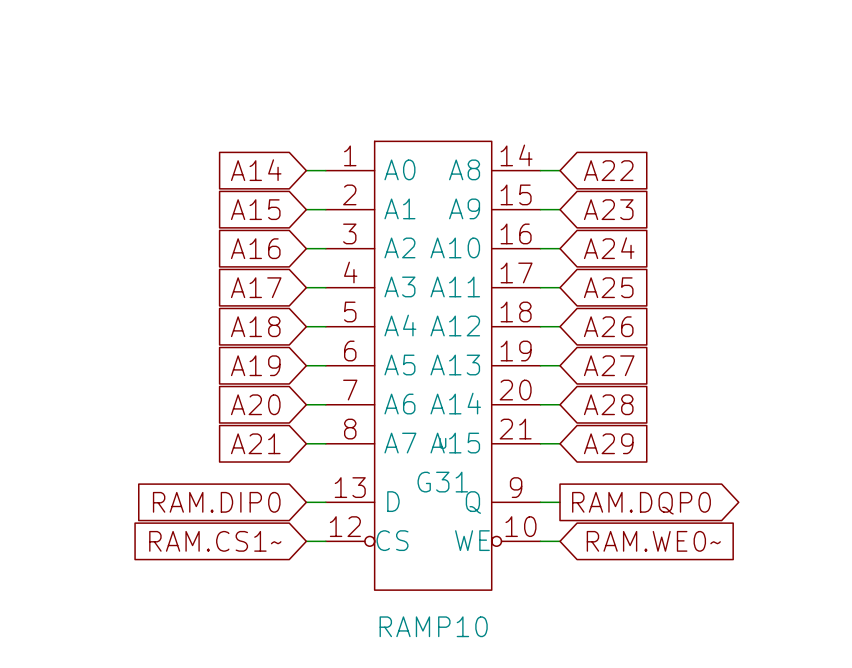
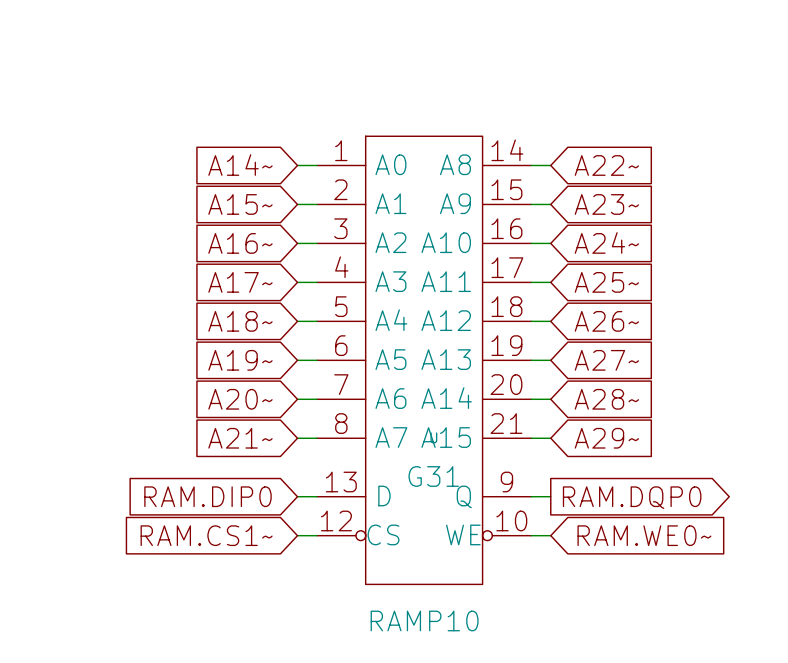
global label: A14 (256, 170) -> A14~ (240, 165)
global label: A22 (608, 170) -> A22~ (606, 165)
global label: A15 (255, 209) -> A15~ (240, 204)
global label: A23 (608, 209) -> A23~ (606, 204)
global label: A16 (255, 248) -> A16~ (240, 243)
global label: A24 (609, 248) -> A24~ (606, 242)
global label: A17 (256, 287) -> A17~ (240, 282)
global label: A25 (608, 287) -> A25~ (606, 282)
global label: A18 (255, 326) -> A18~ (240, 321)
global label: A26 (608, 326) -> A26~ (606, 321)
global label: A19 (255, 365) -> A19~ (240, 360)
global label: A27 (609, 365) -> A27~ (606, 360)
global label: A20 (255, 404) -> A20~ (240, 399)
global label: A28 (608, 404) -> A28~ (606, 399)
global label: A21 (255, 443) -> A21~ (240, 438)
global label: A29 (608, 443) -> A29~ (606, 438)

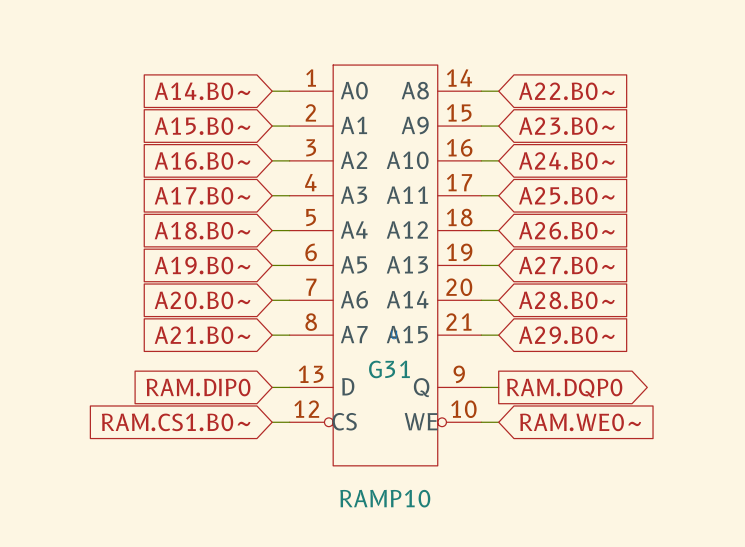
global label: A14~ (240, 165) -> A14.B0~ (202, 91)
global label: A22~ (606, 165) -> A22.B0~ (566, 91)
global label: A15~ (240, 204) -> A15.B0~ (202, 126)
global label: A23~ (606, 204) -> A23.B0~ (566, 126)
global label: A24~ (606, 242) -> A24.B0~ (566, 160)
global label: A16~ (240, 243) -> A16.B0~ (202, 160)
global label: A17~ (240, 282) -> A17.B0~ (202, 195)
global label: A25~ (606, 282) -> A25.B0~ (566, 195)
global label: A18~ (240, 321) -> A18.B0~ (202, 230)
global label: A26~ (606, 321) -> A26.B0~ (566, 230)
global label: A19~ (240, 360) -> A19.B0~ (202, 265)
global label: A27~ (606, 360) -> A27.B0~ (566, 265)
global label: A20~ (240, 399) -> A20.B0~ (202, 300)
global label: A28~ (606, 399) -> A28.B0~ (566, 300)
global label: A21~ (240, 438) -> A21.B0~ (202, 335)
global label: A29~ (606, 438) -> A29.B0~ (566, 335)
global label: RAM.CS1~ (206, 535) -> RAM.CS1.B0~ (176, 422)

